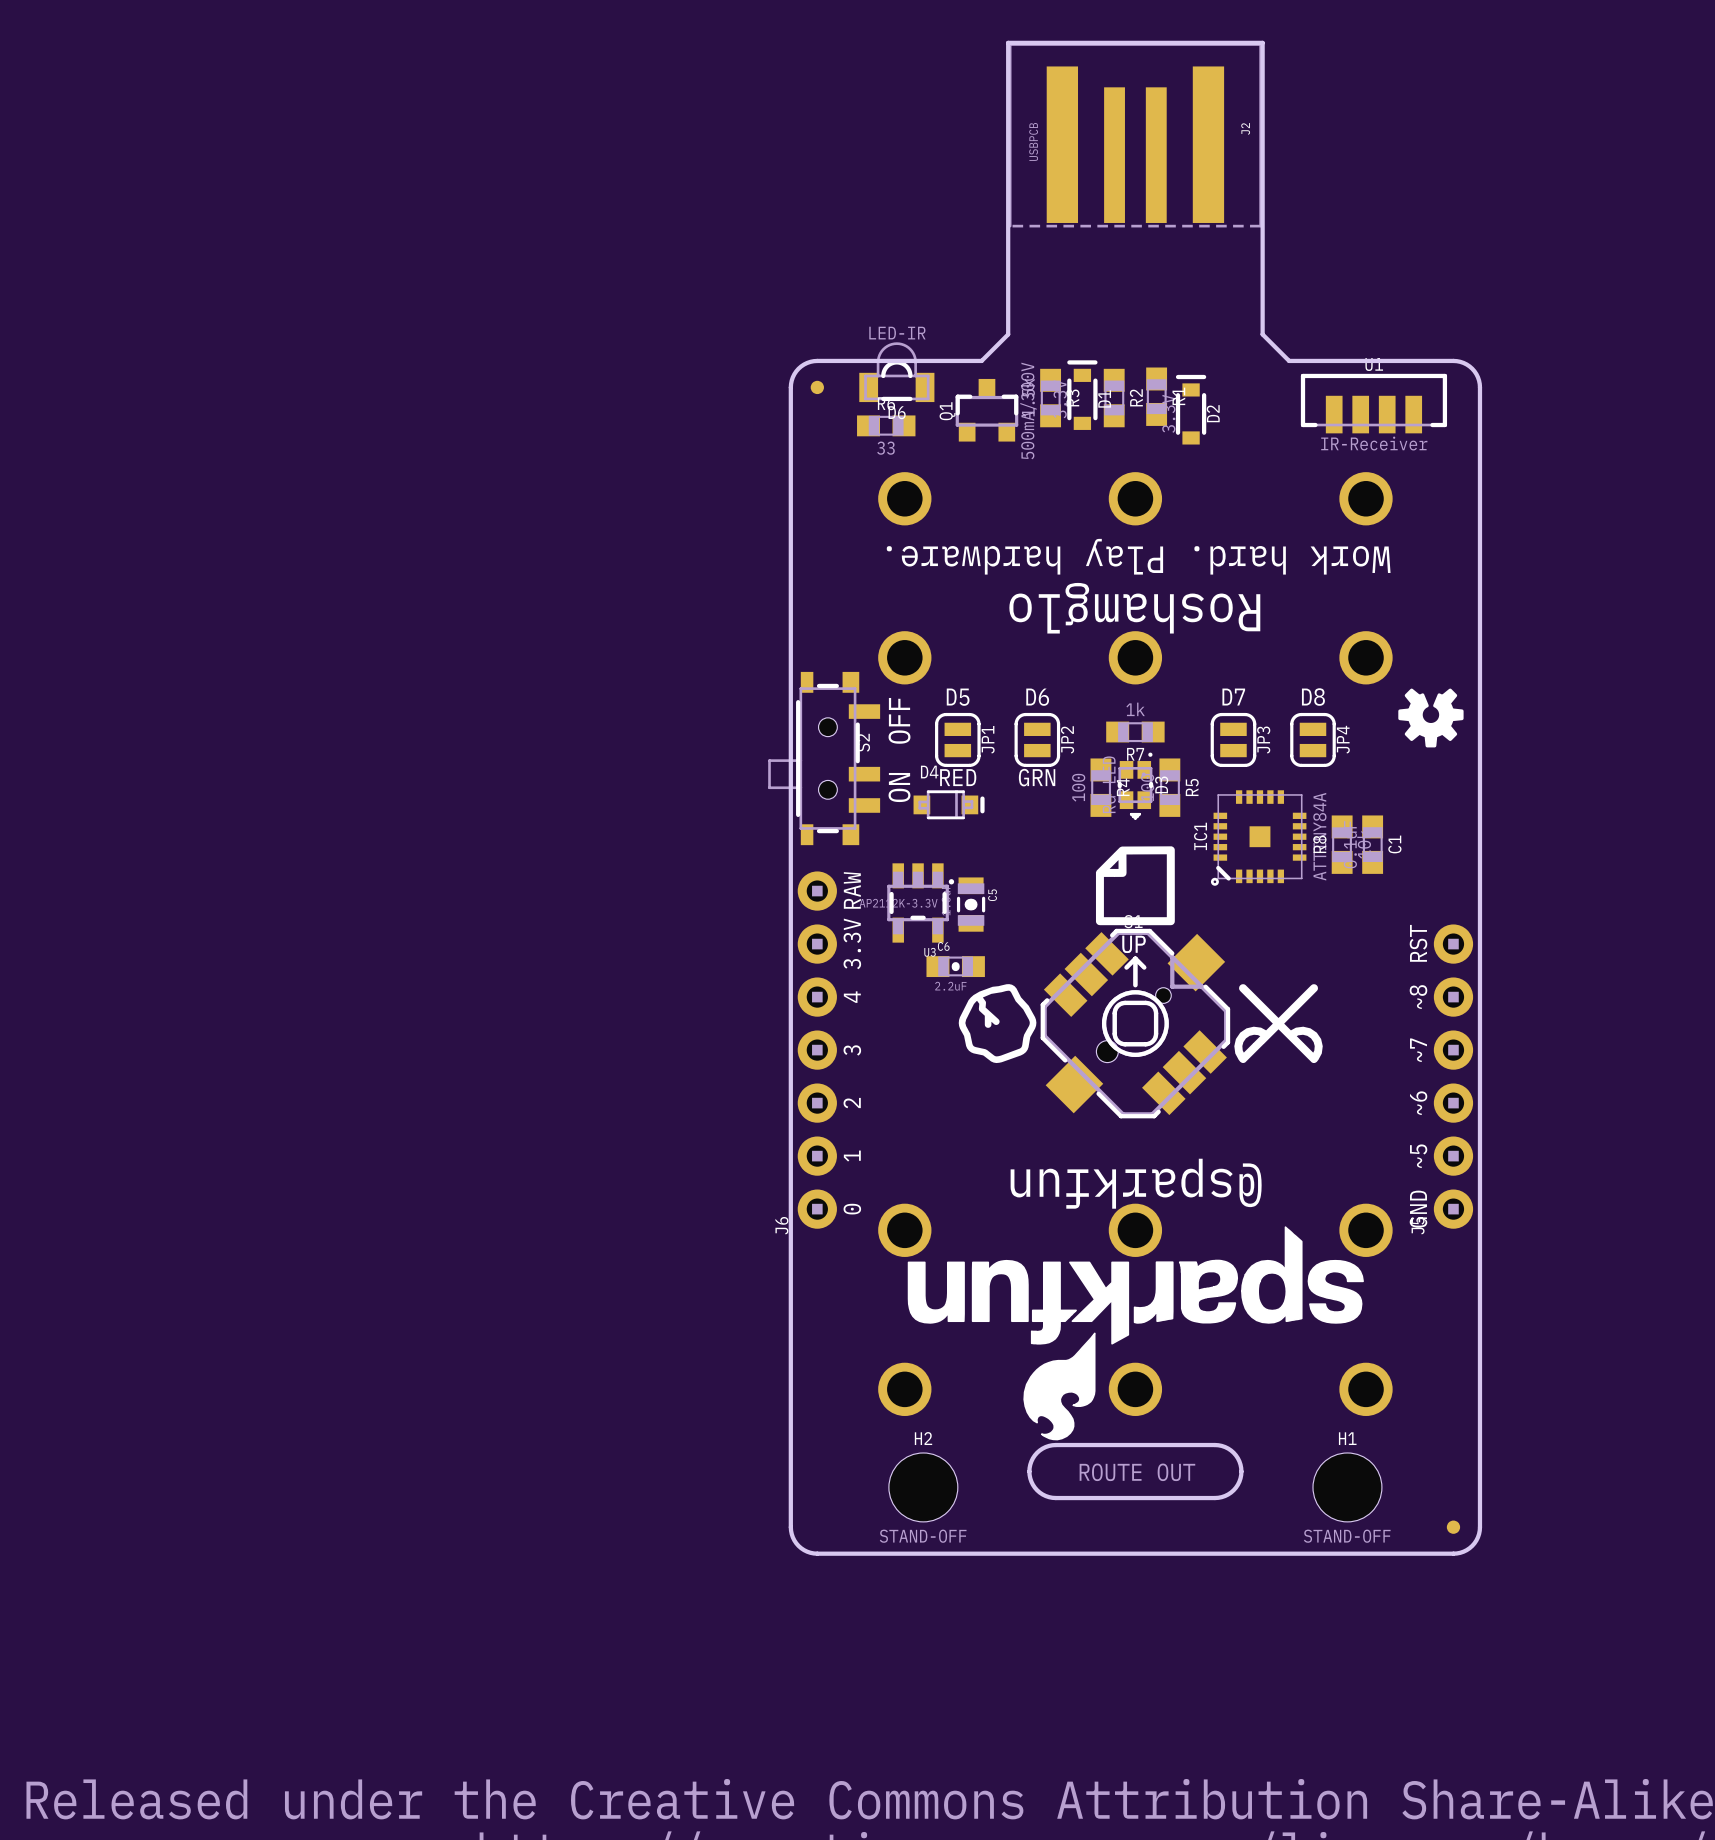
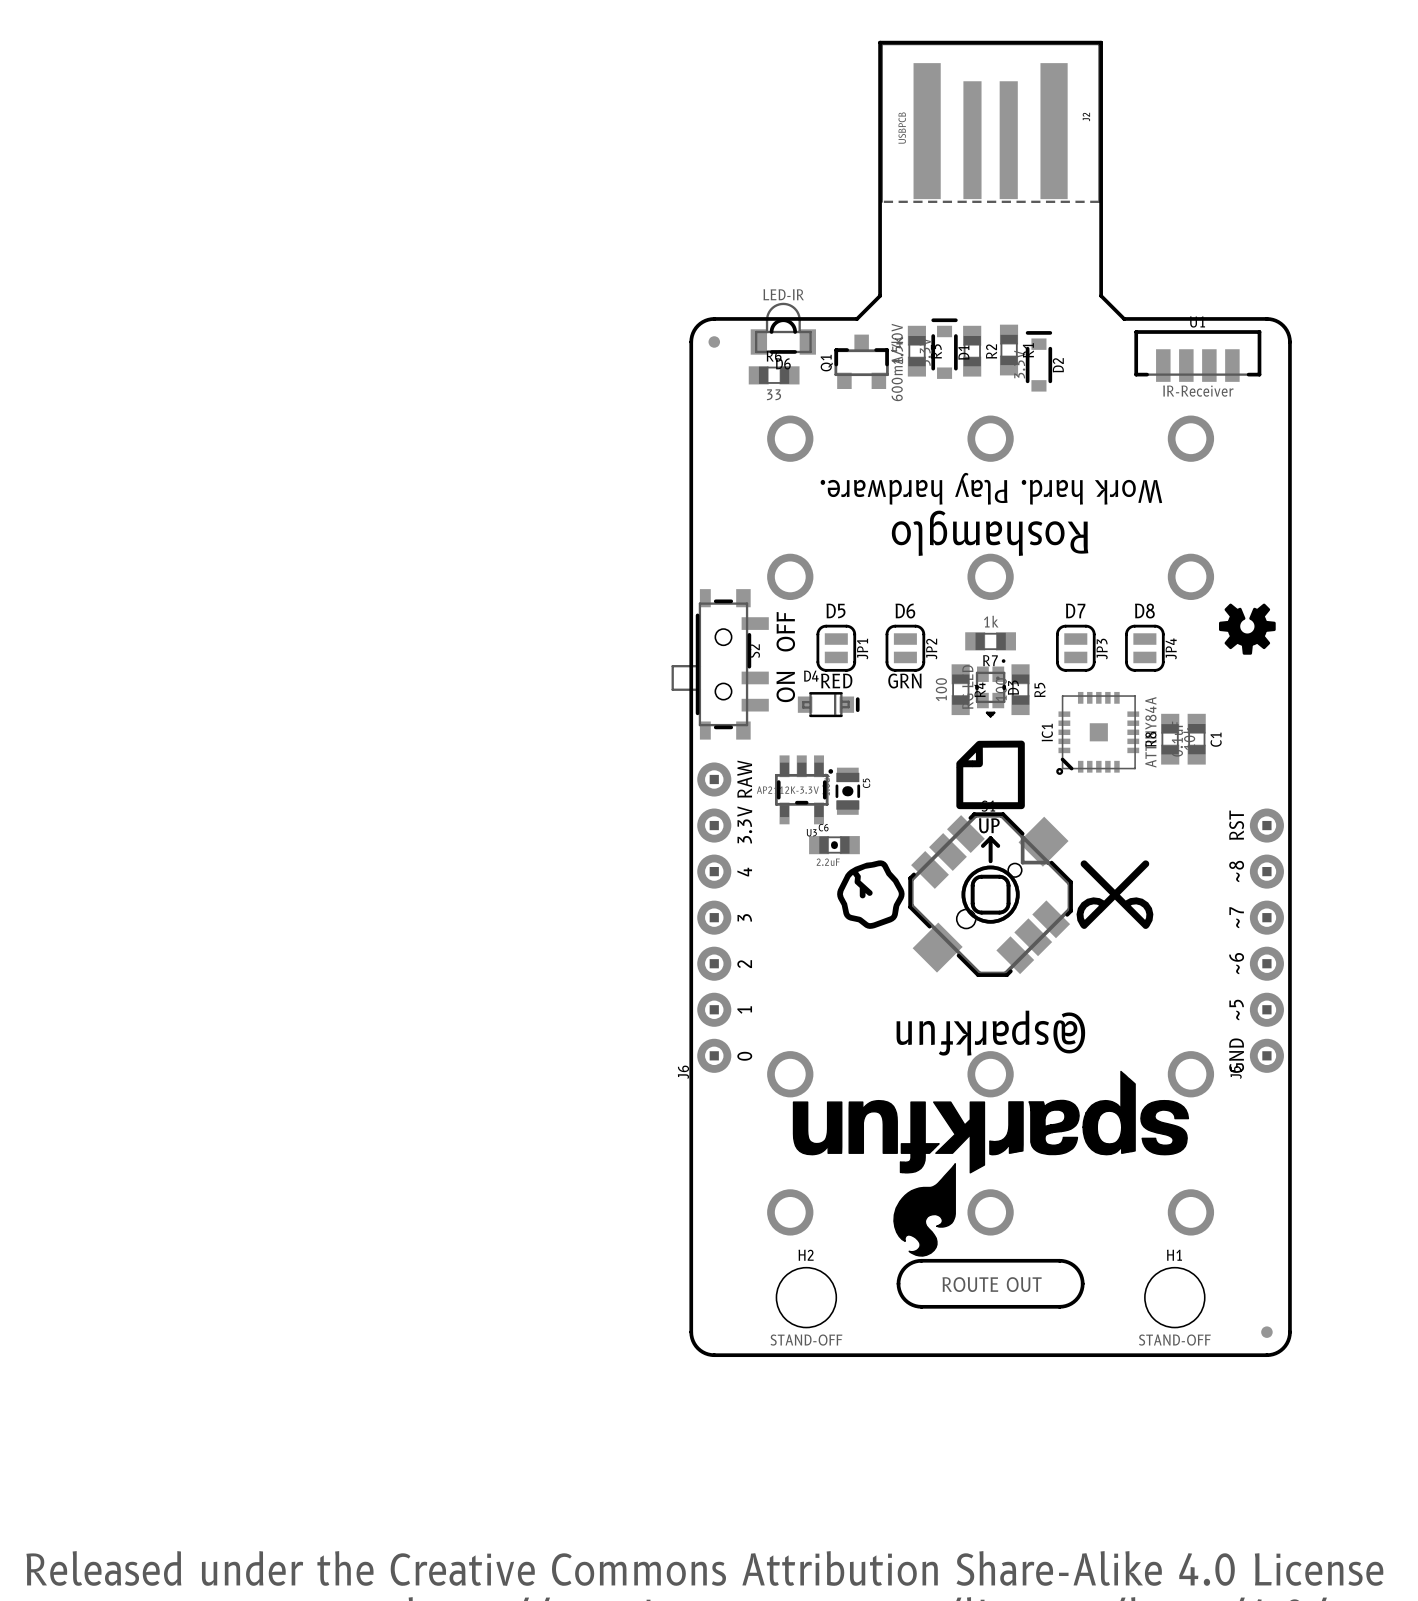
Q1 value: 500mA/300V (1028, 411) -> 600mA/40V (897, 362)

